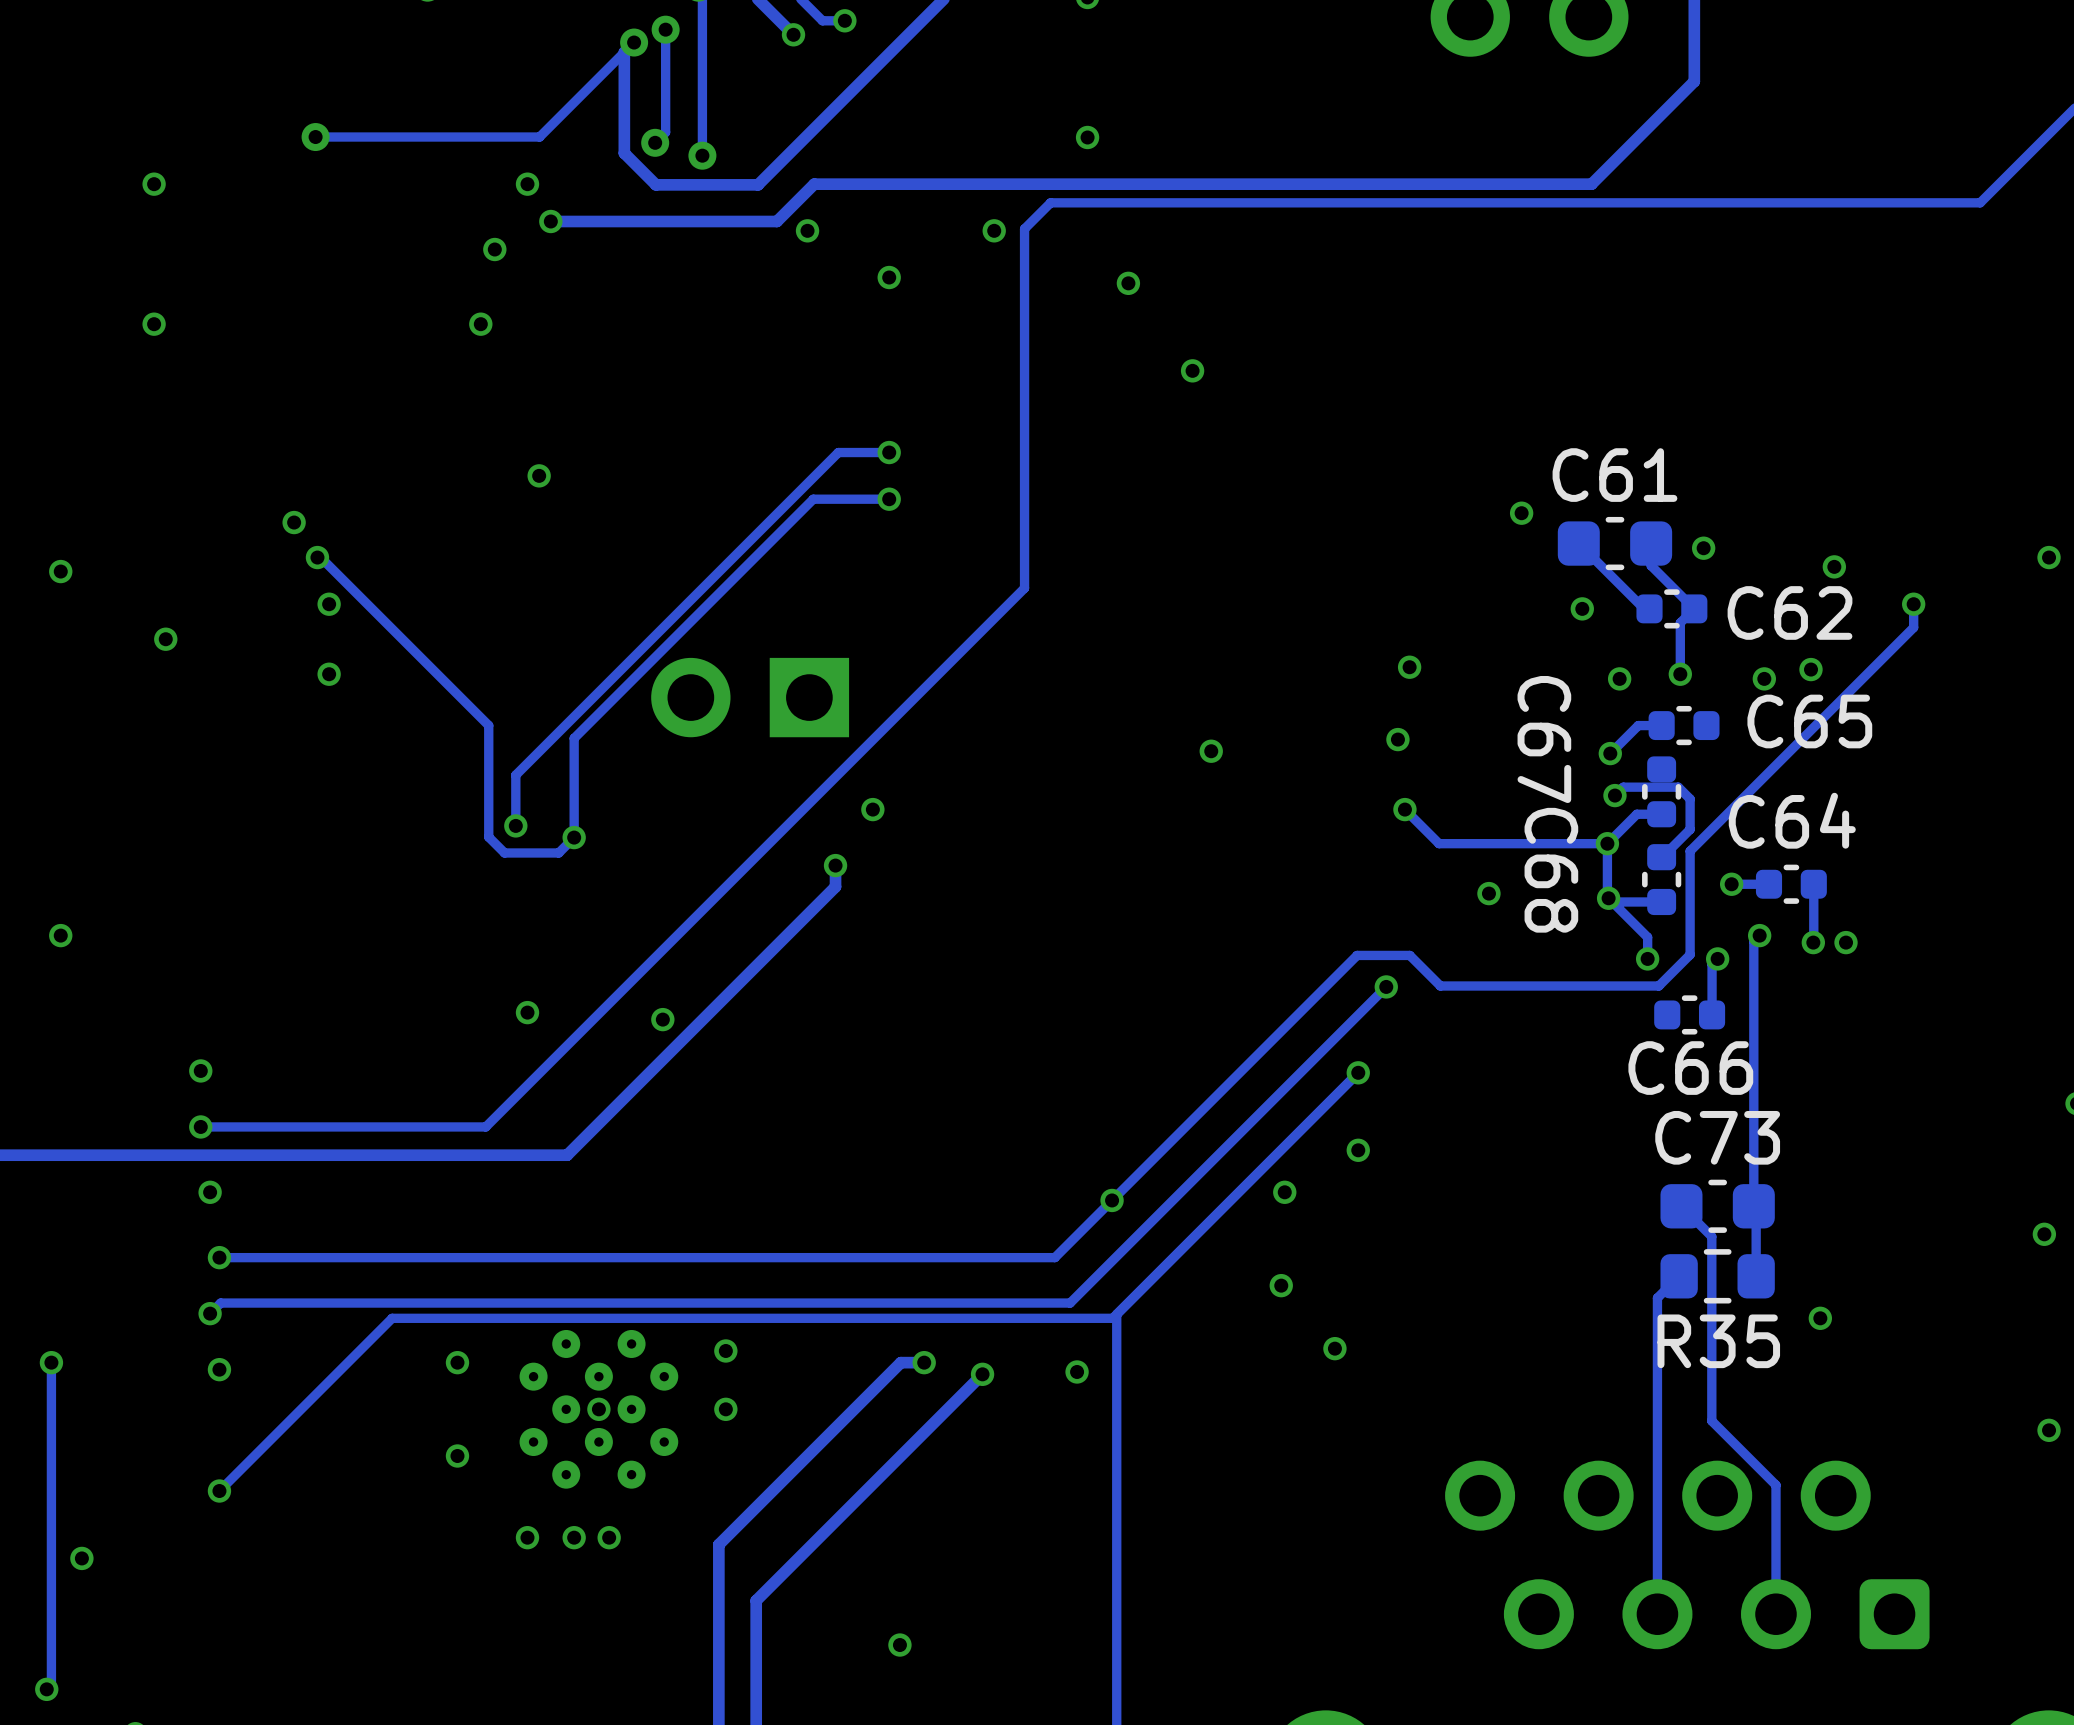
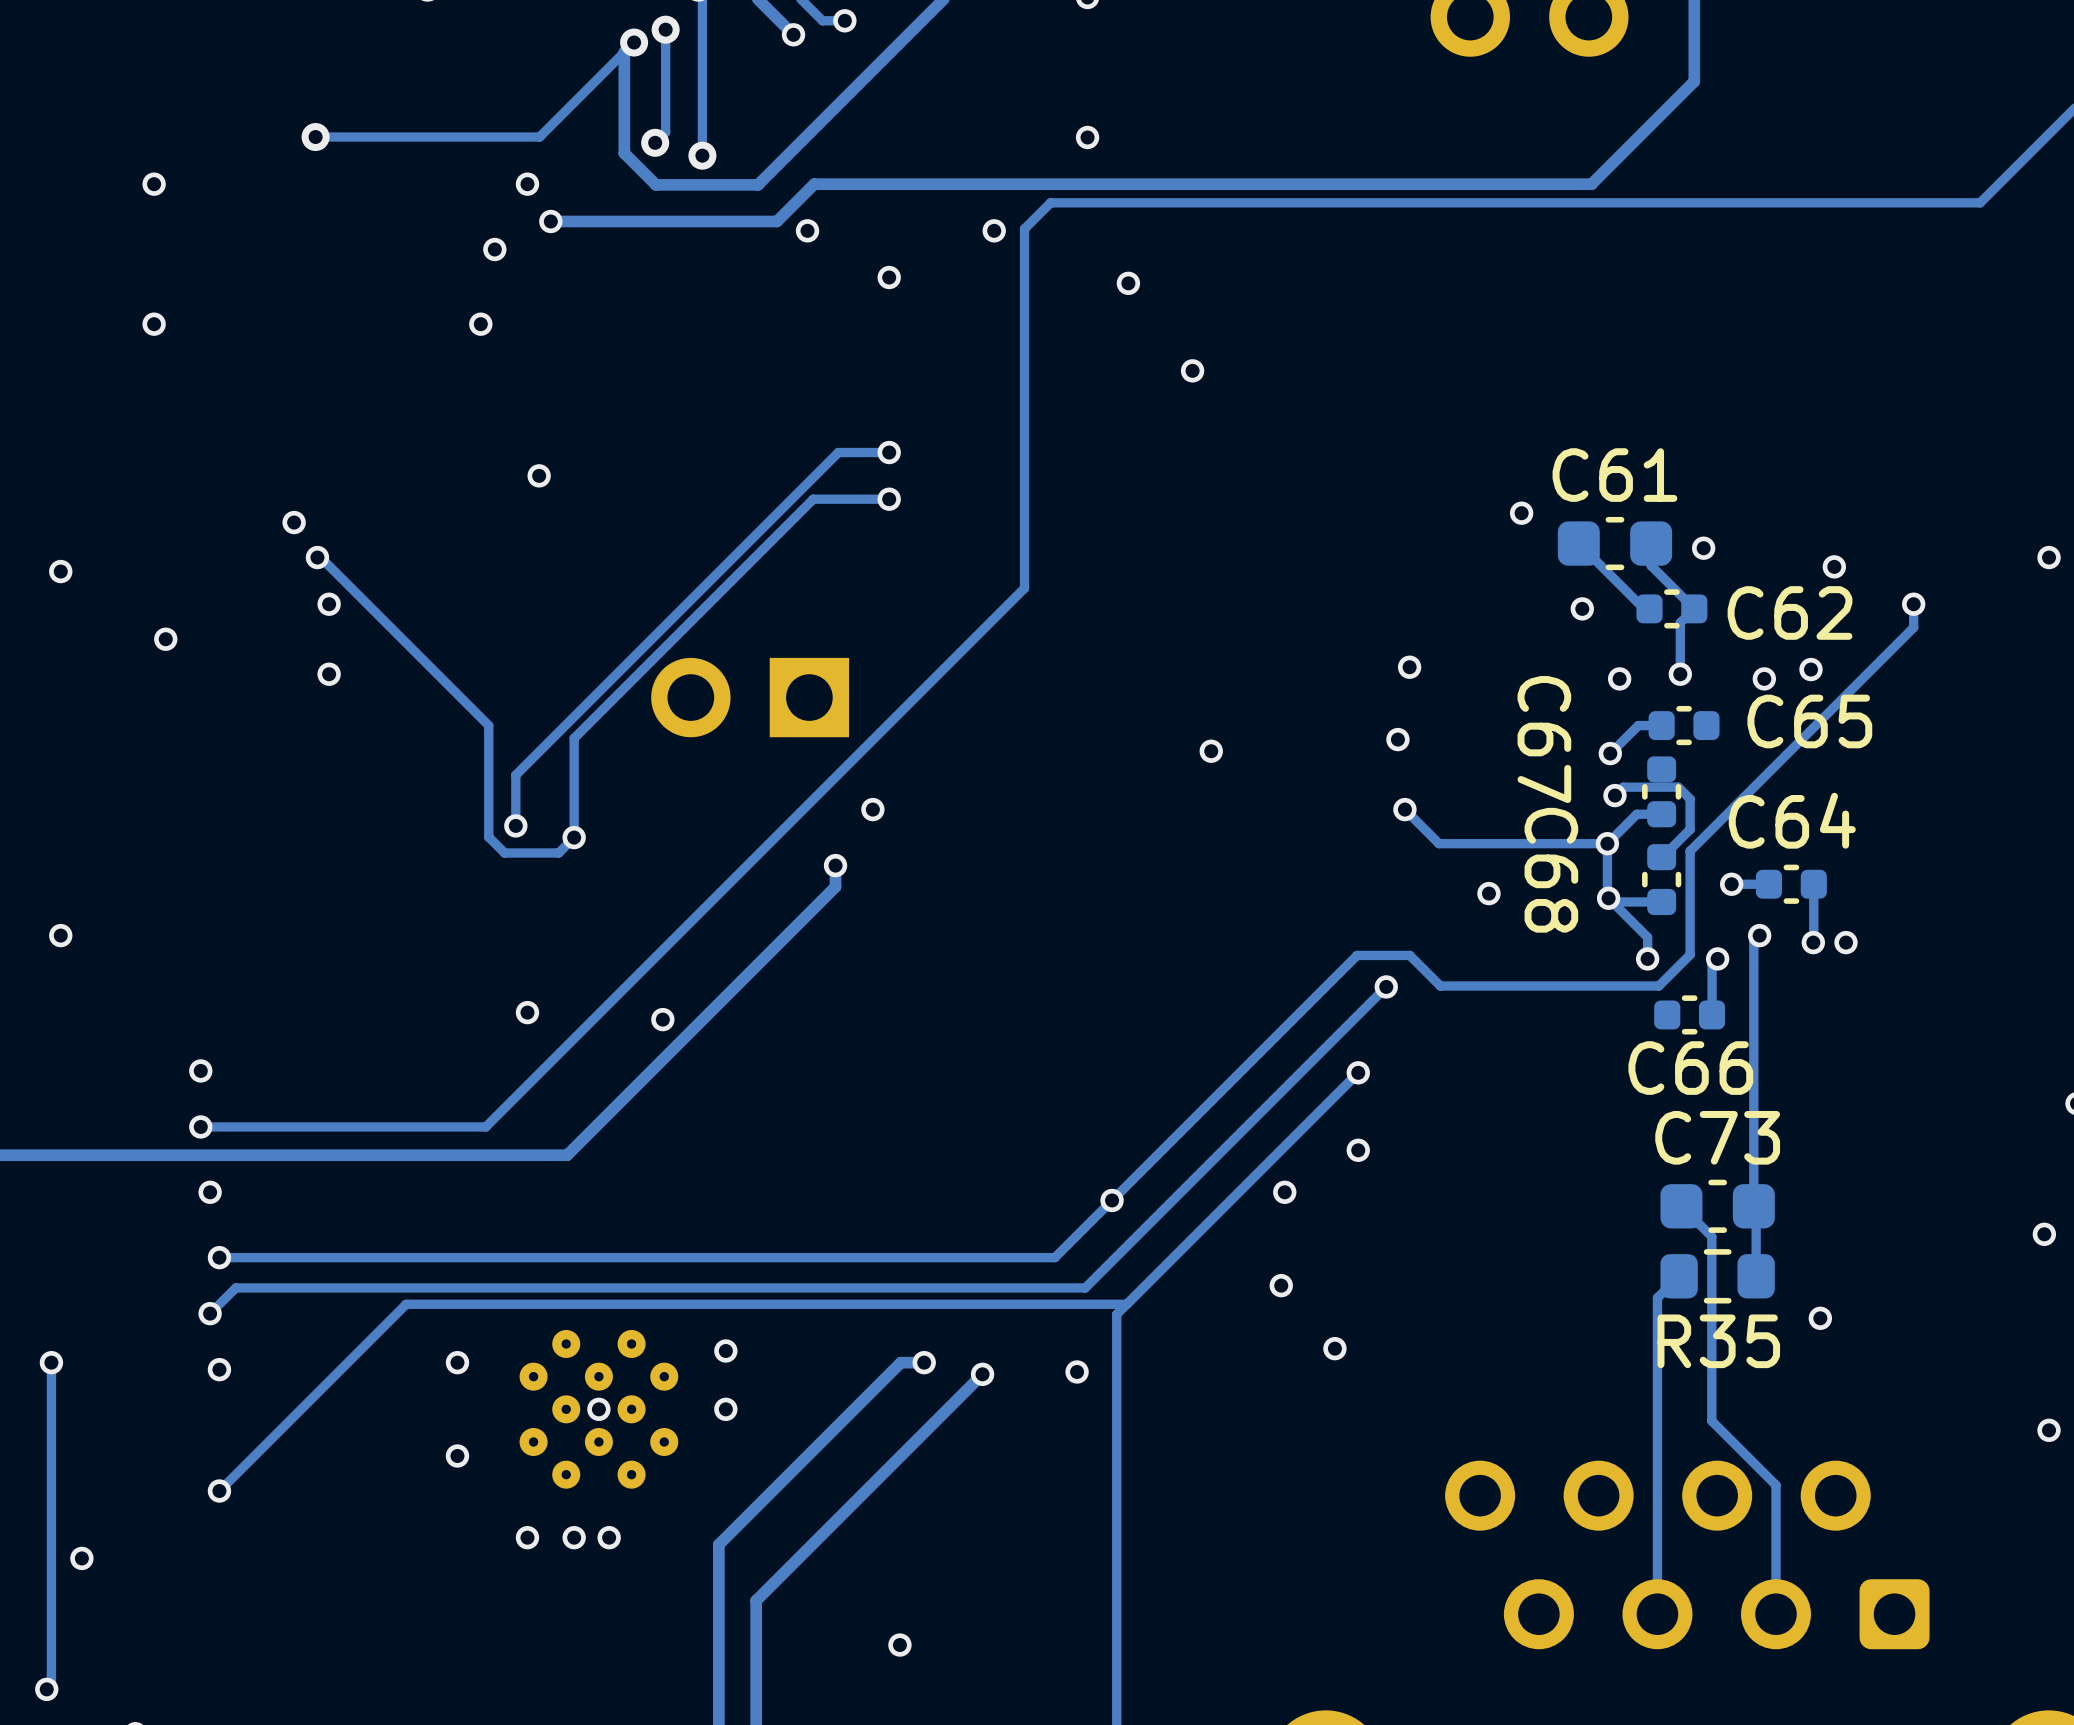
track: (1085, 1287) (1070, 1303) (220, 1303) -> (1085, 1287) (235, 1287) (220, 1303)
track: (1116, 1314) (1112, 1318) (392, 1318) -> (1126, 1304) (406, 1304) (392, 1318)

